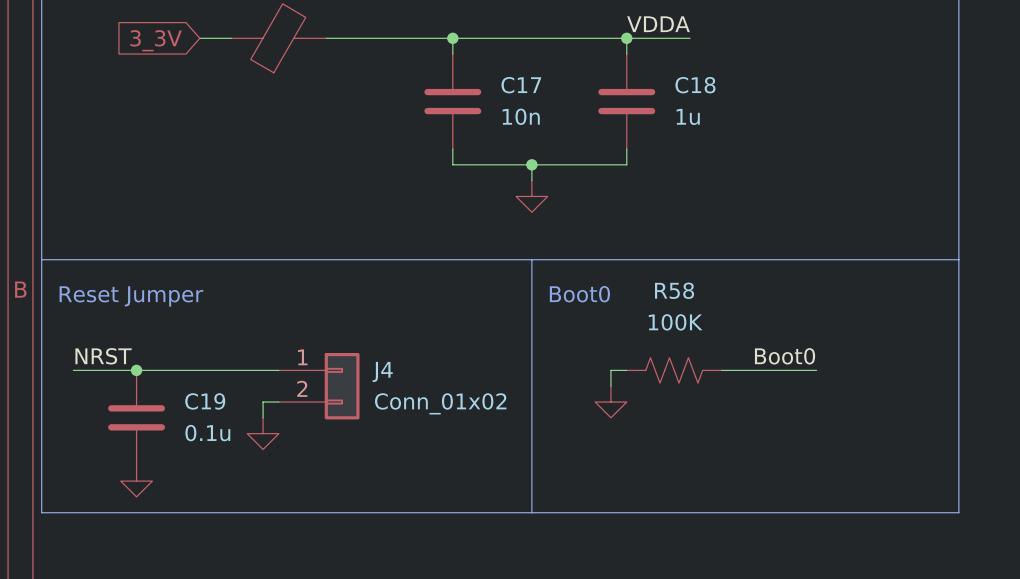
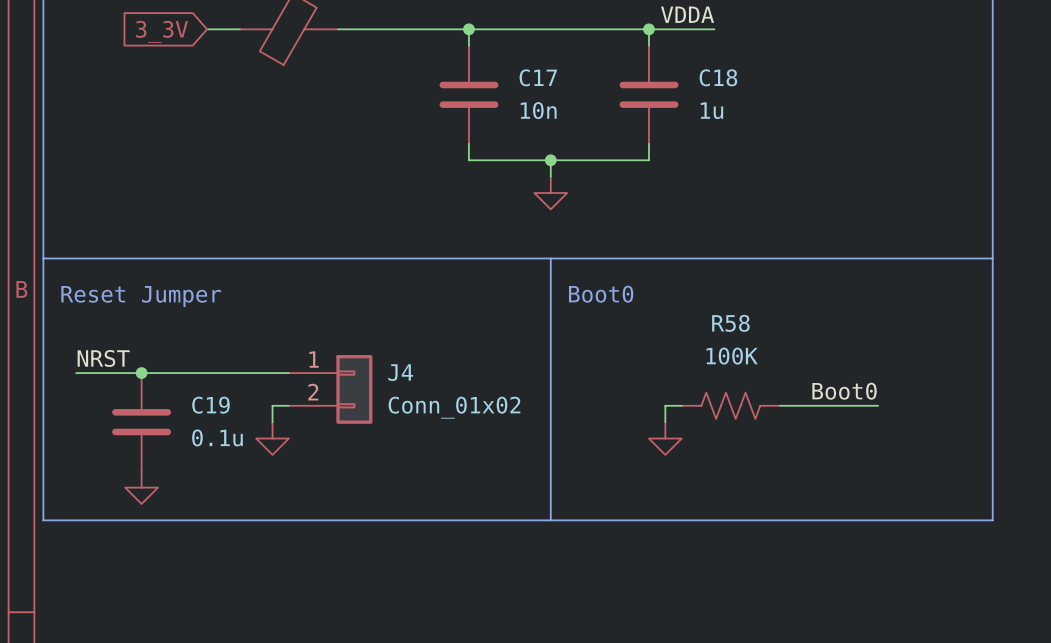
label position: Boot0 (785, 356) -> Boot0 (844, 391)
wire: (626, 370) (610, 370) (610, 386) -> (681, 405) (665, 405) (665, 422)
R58 position: (674, 370) -> (730, 405)
wire: (721, 370) (816, 370) -> (779, 405) (878, 405)
power symbol position: (610, 402) -> (665, 438)

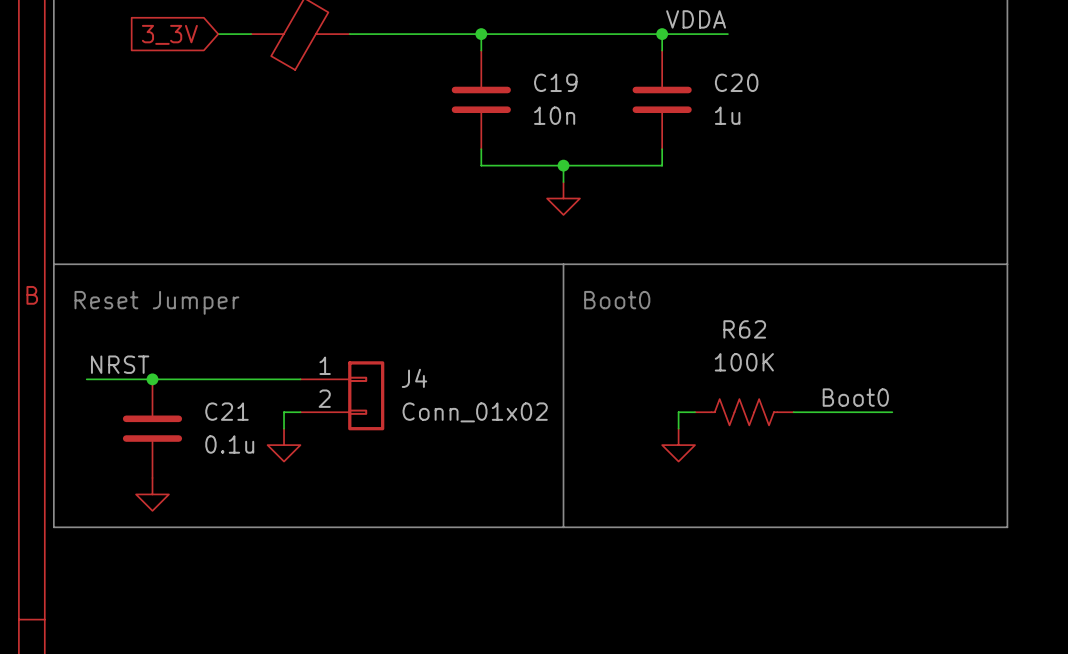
C17 name: C17 (538, 77) -> C19 (555, 82)
C18 name: C18 (718, 77) -> C20 (736, 82)
R58 name: R58 (730, 323) -> R62 (744, 329)
C19 name: C19 (210, 405) -> C21 (226, 411)

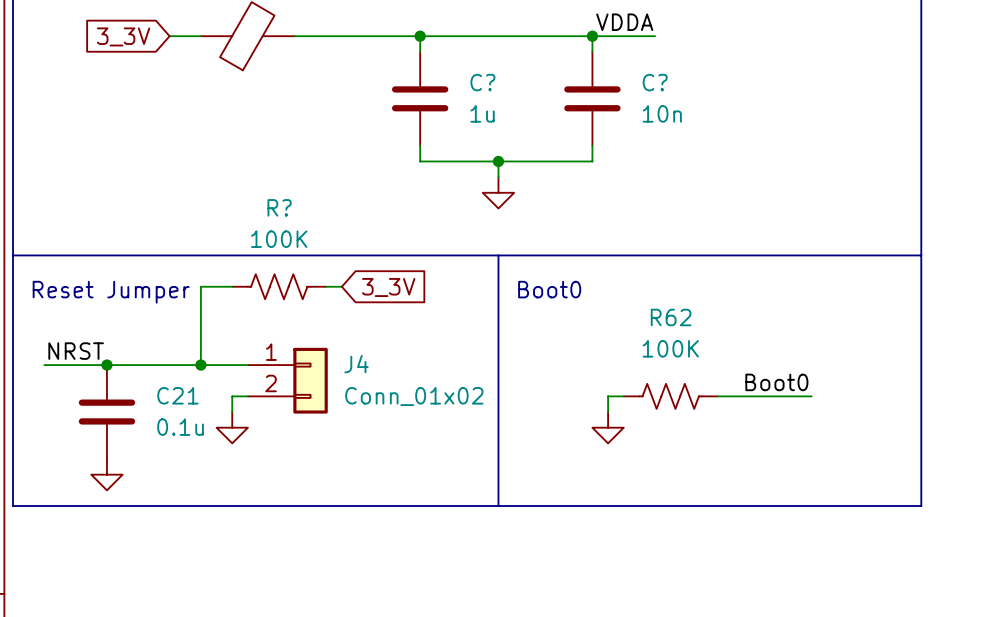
C19 name: C19 (555, 82) -> C? (482, 82)
C20 name: C20 (736, 82) -> C? (655, 82)
C19 value: 10n (554, 115) -> 1u (482, 113)
C20 value: 1u (727, 115) -> 10n (662, 113)
wire: none -> (232, 286) (200, 286) (200, 365)
R?: none -> 100K (279, 286)
wire: none -> (326, 286) (341, 286)
global label: none -> 3_3V (388, 287)
junction: none -> (200, 365)

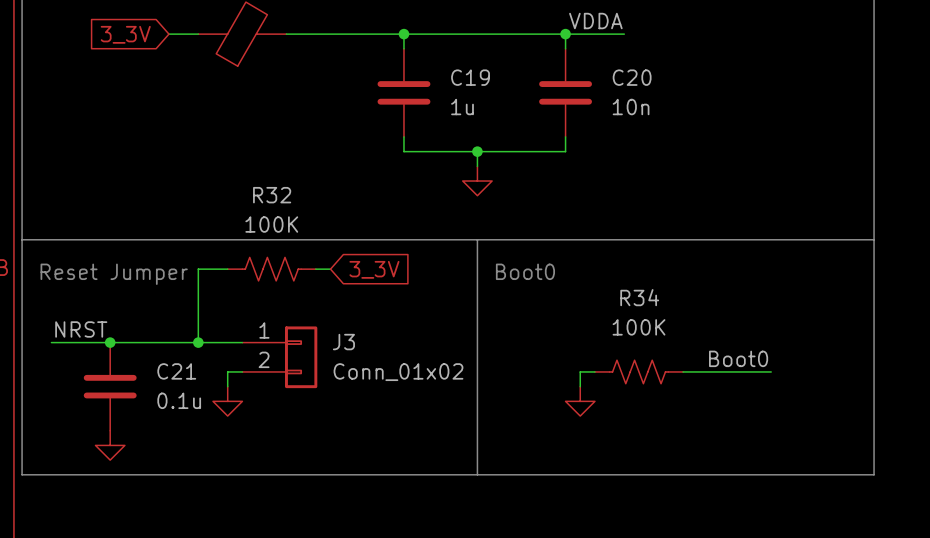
C? name: C? (482, 82) -> C19 (470, 77)
C? name: C? (655, 82) -> C20 (632, 77)
R? name: R? (279, 207) -> R32 (272, 195)
R62 name: R62 (671, 317) -> R34 (639, 297)
J4 name: J4 (356, 364) -> J3 (343, 342)

